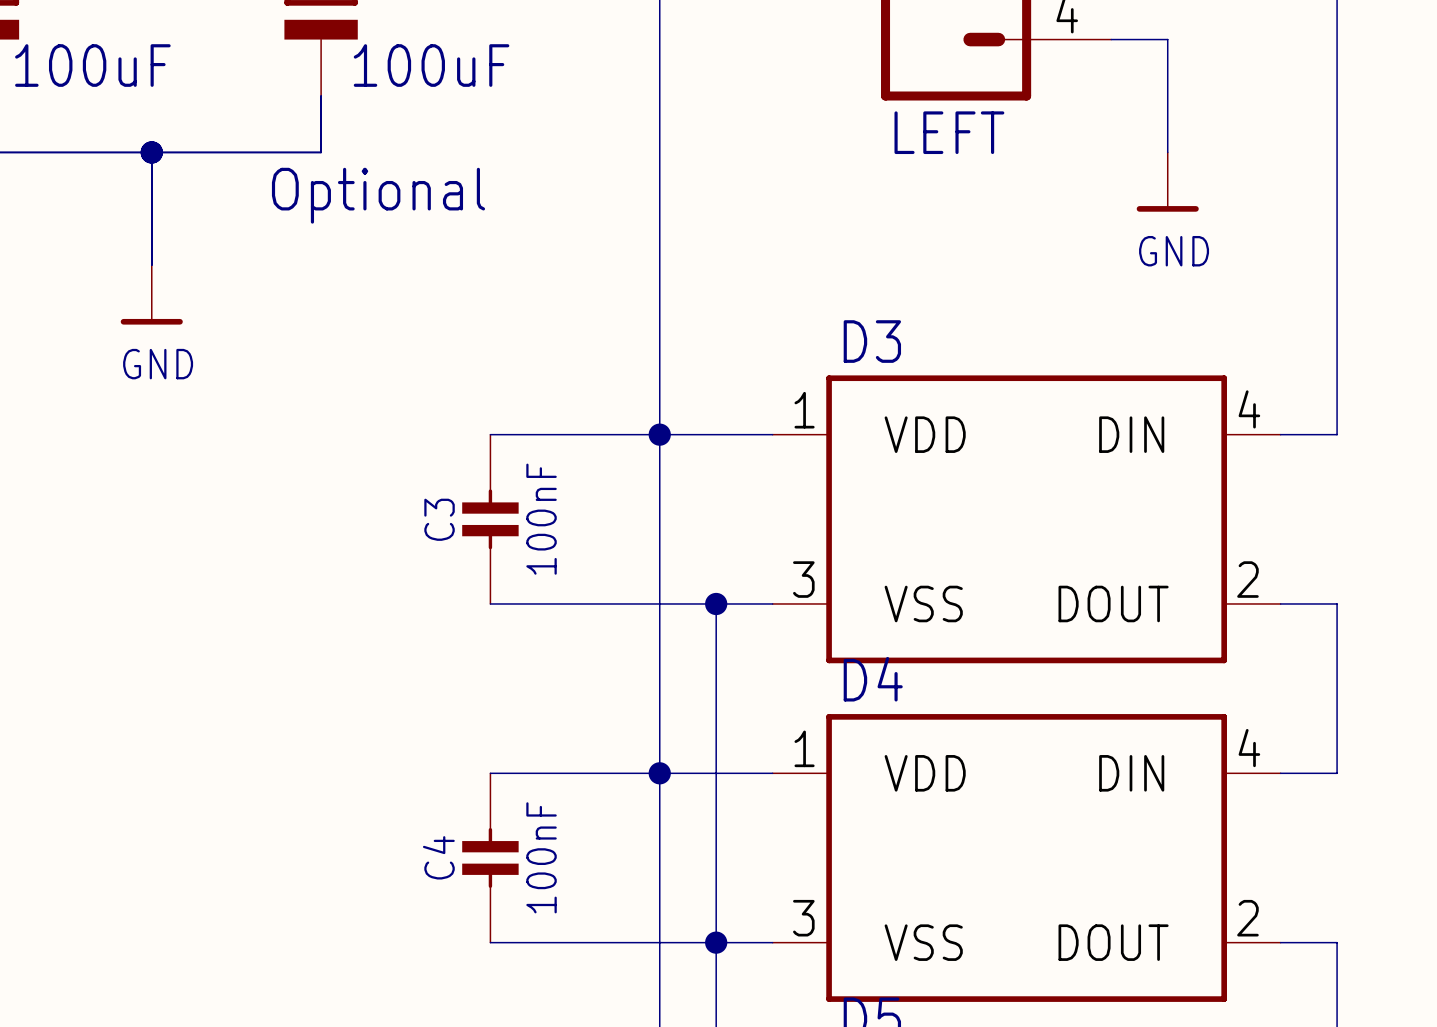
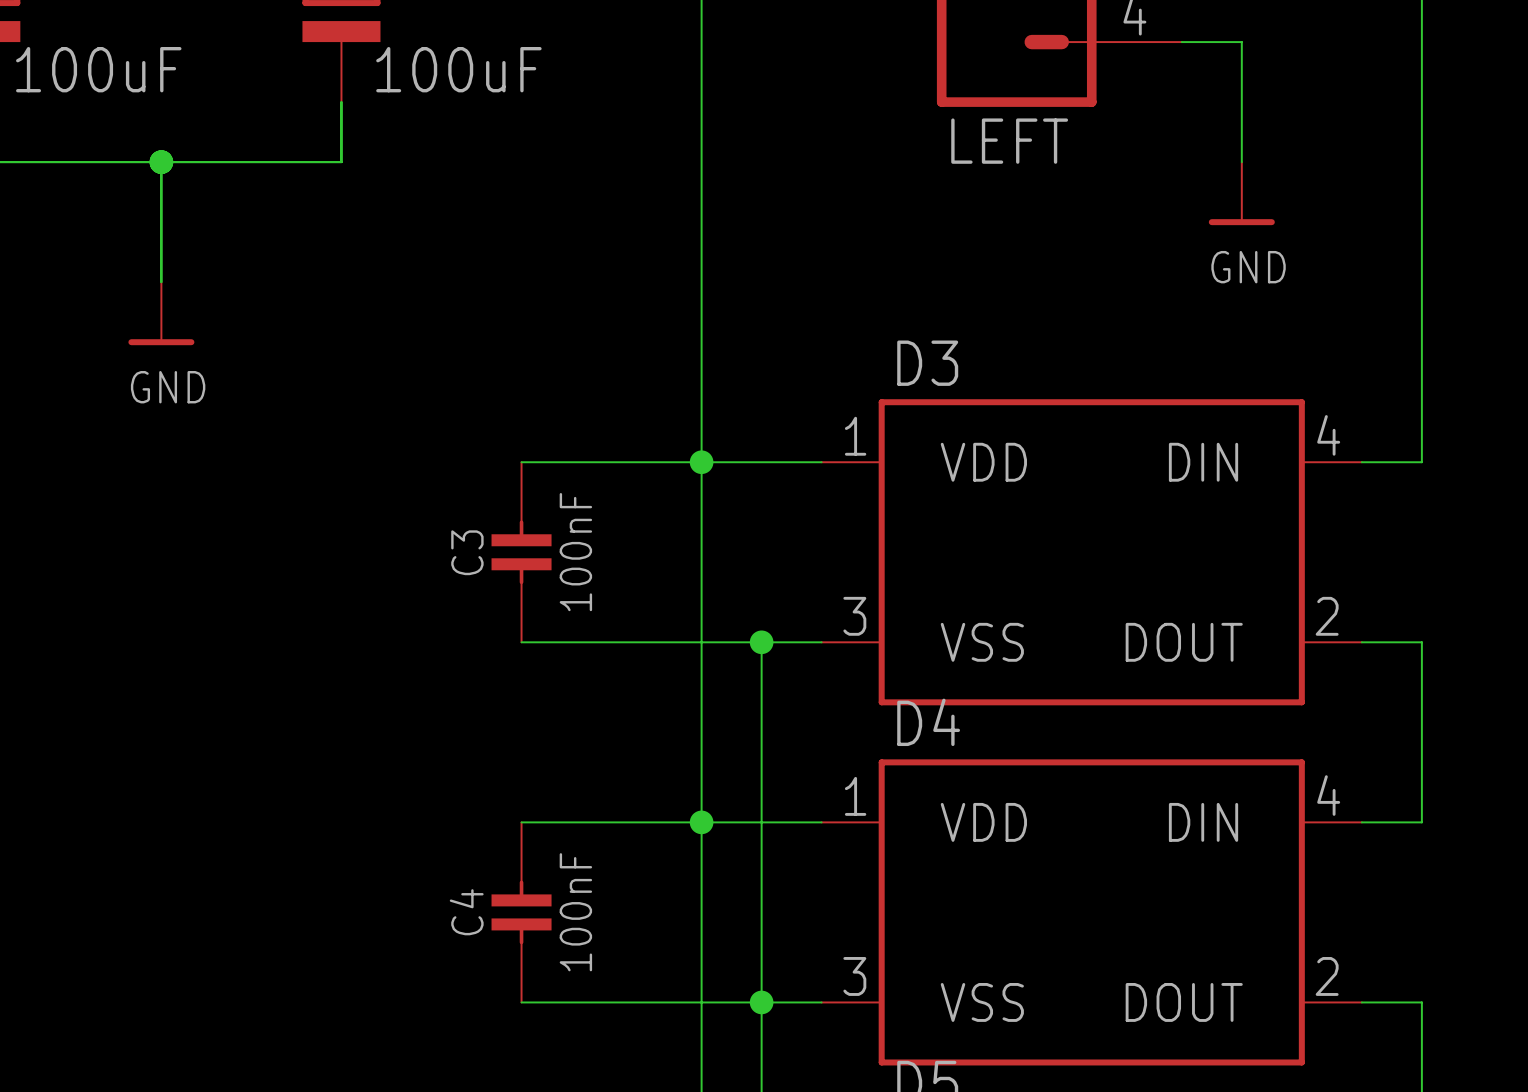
text: Optional (378, 195) -> none

